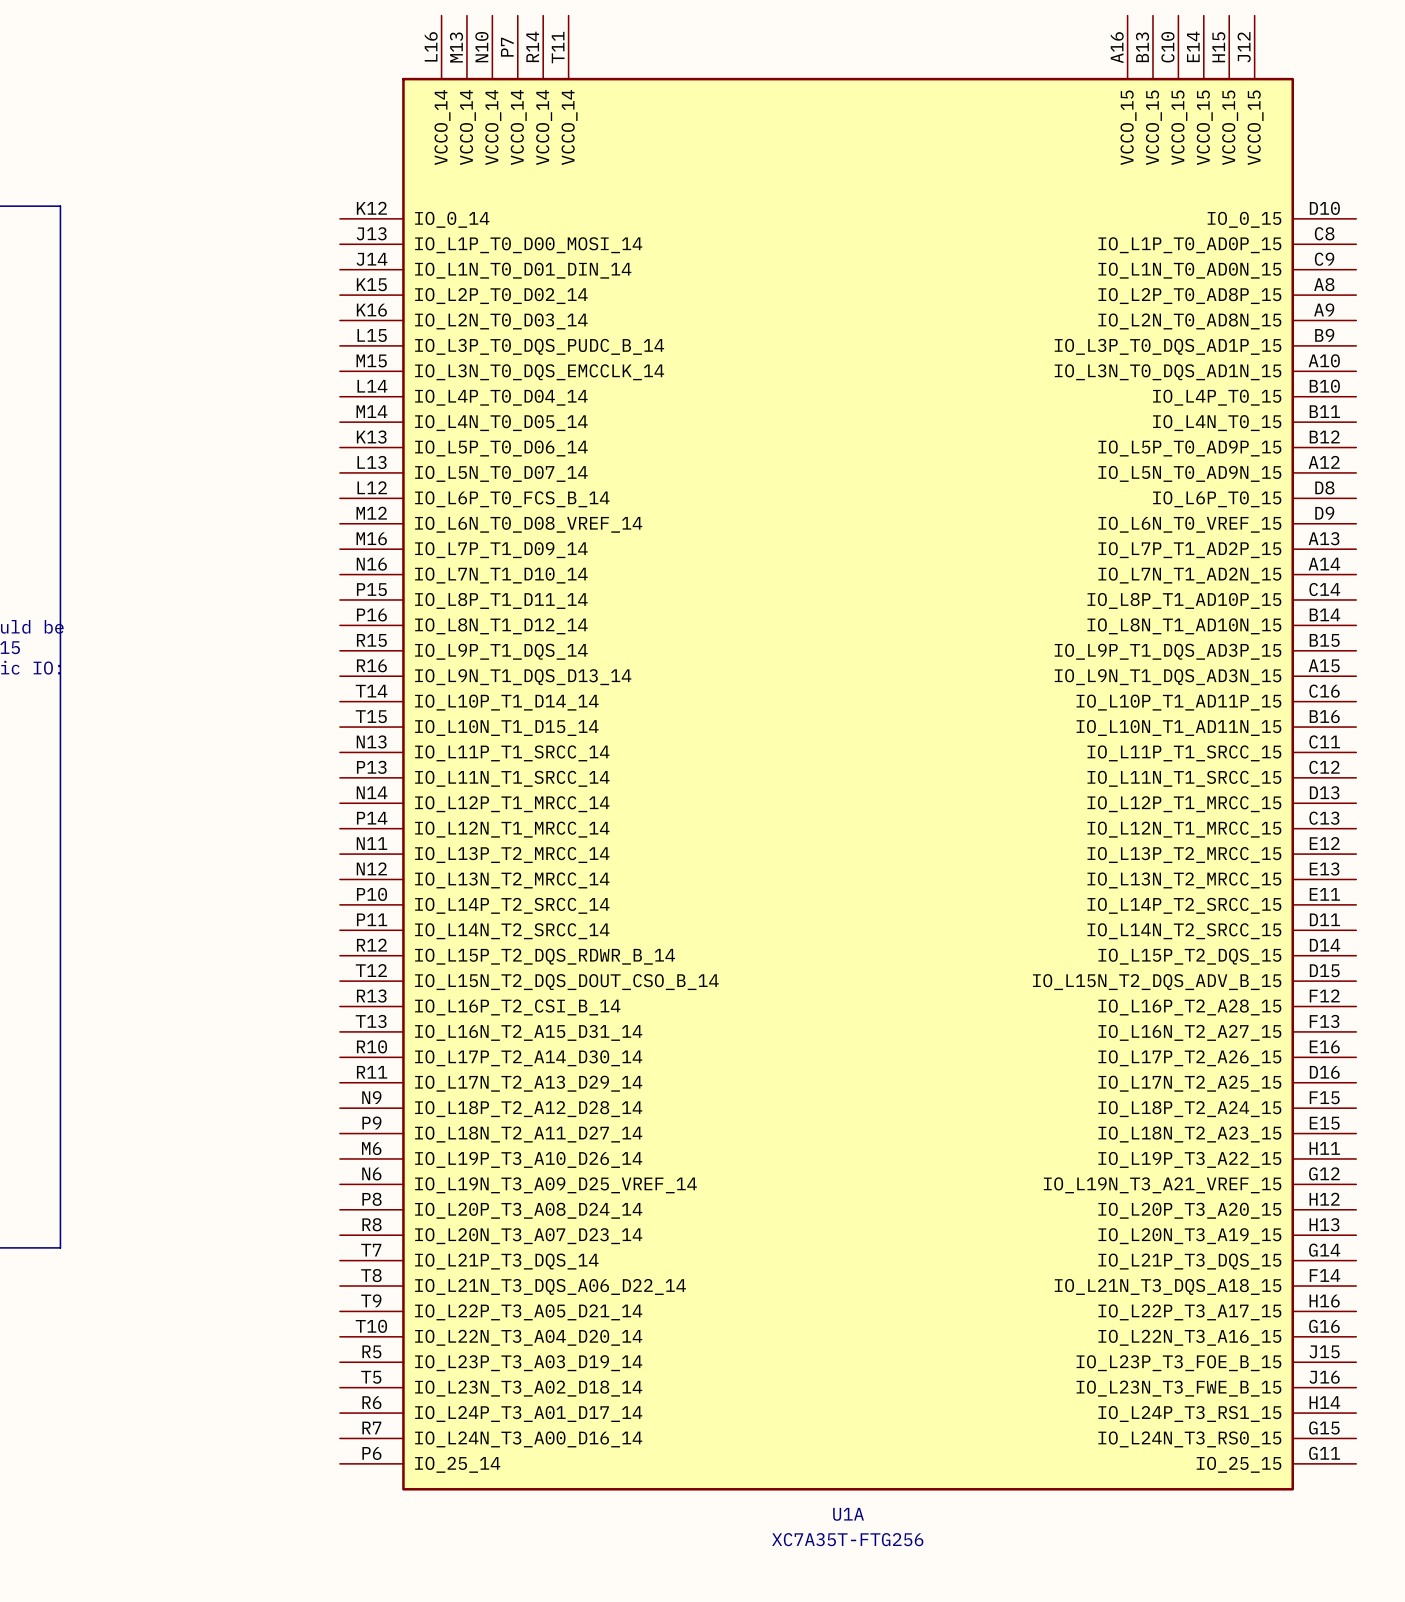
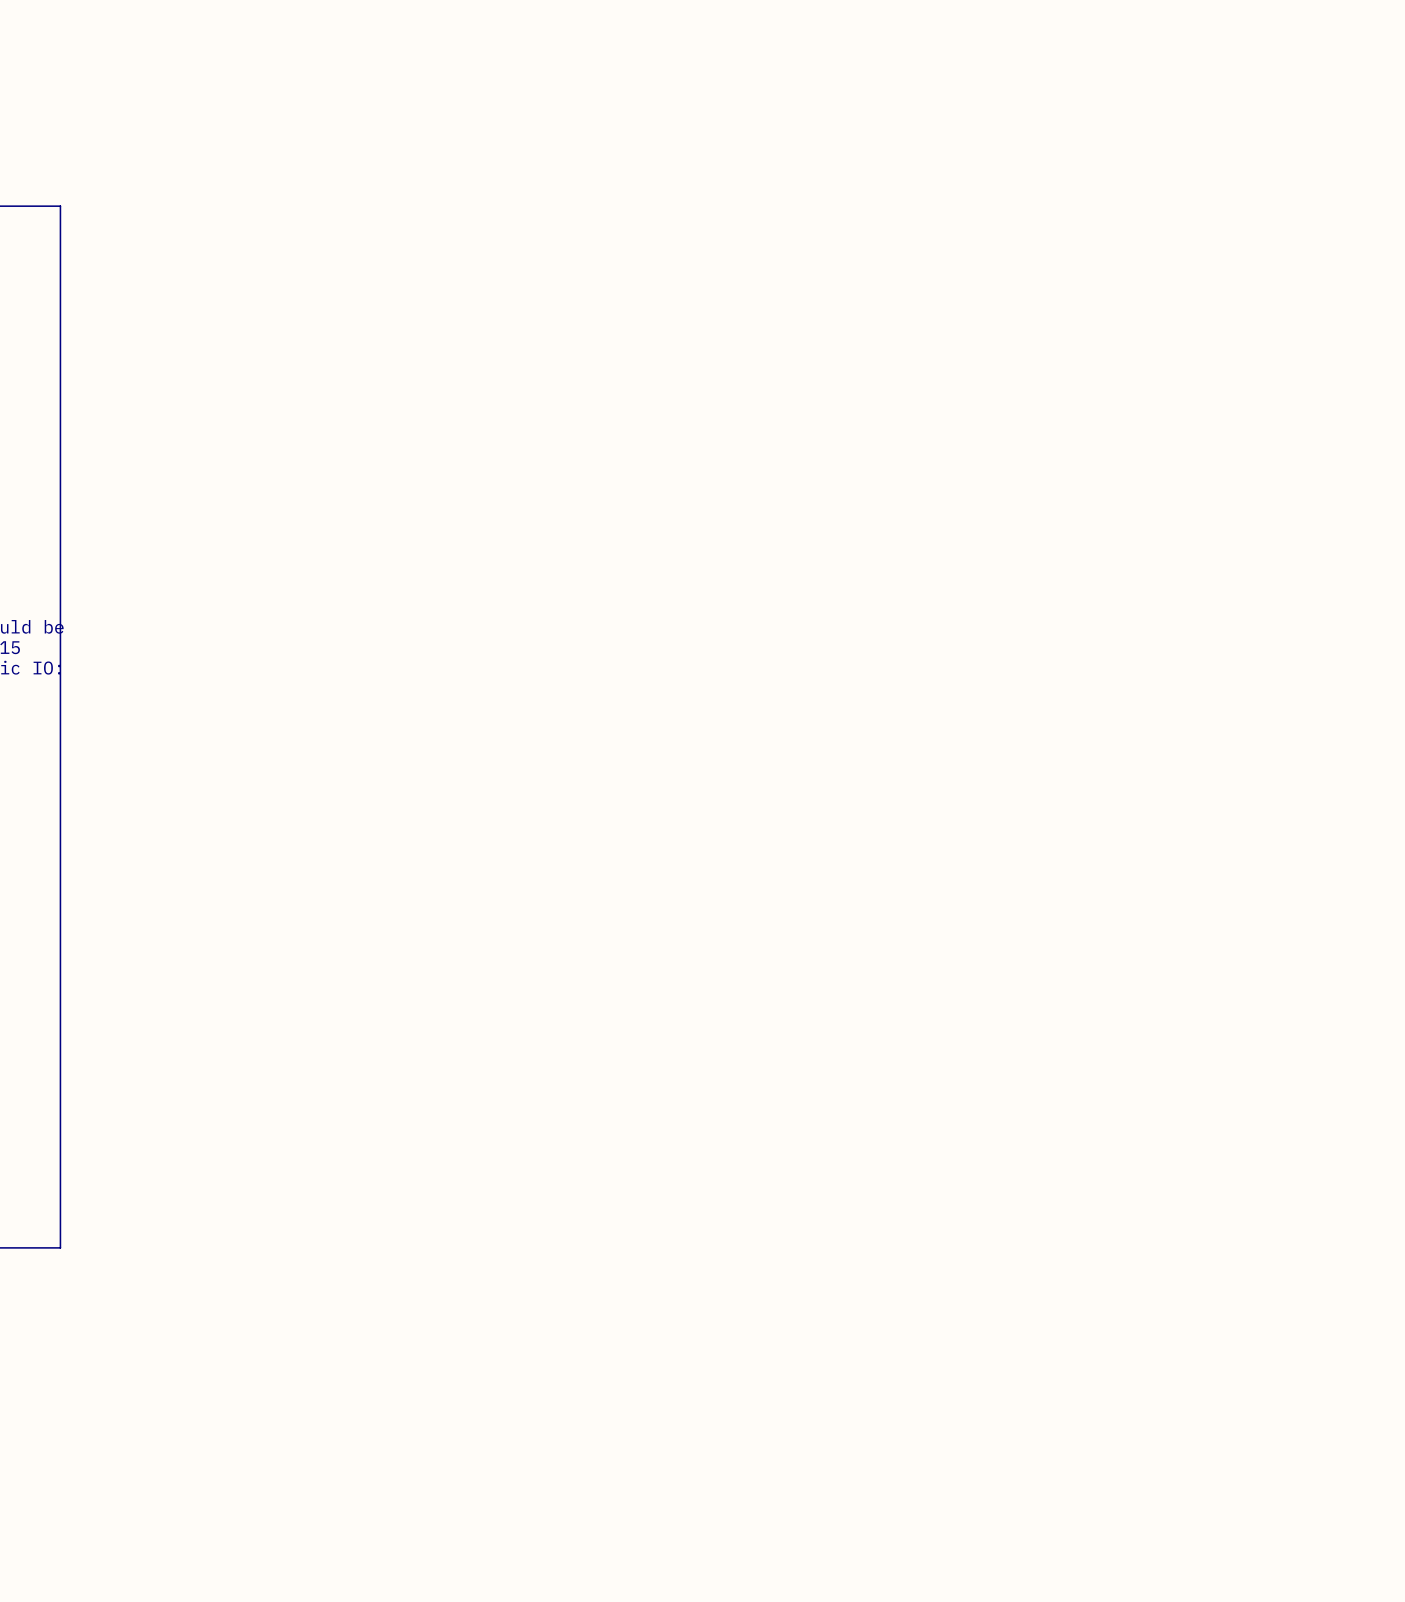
U1A: XC7A35T-FTG256 (848, 753) -> none

